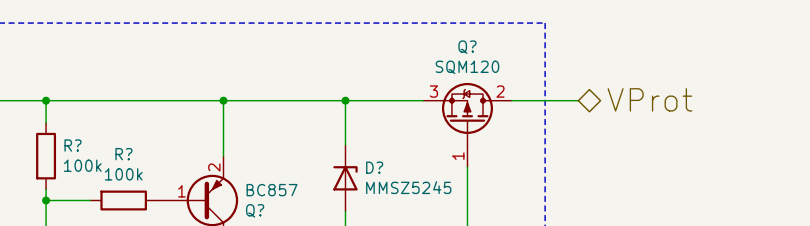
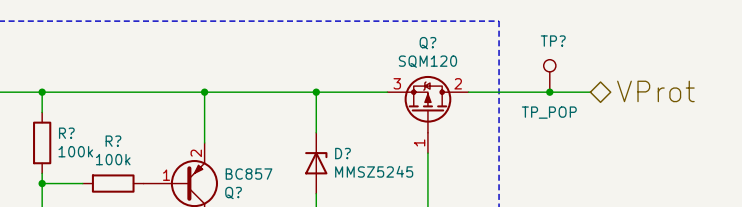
TP?: none -> TP_POP (549, 75)
hierarchical label position: VProt (649, 99) -> VProt (655, 91)
wire: none -> (529, 92) (590, 92)
junction: none -> (549, 92)

